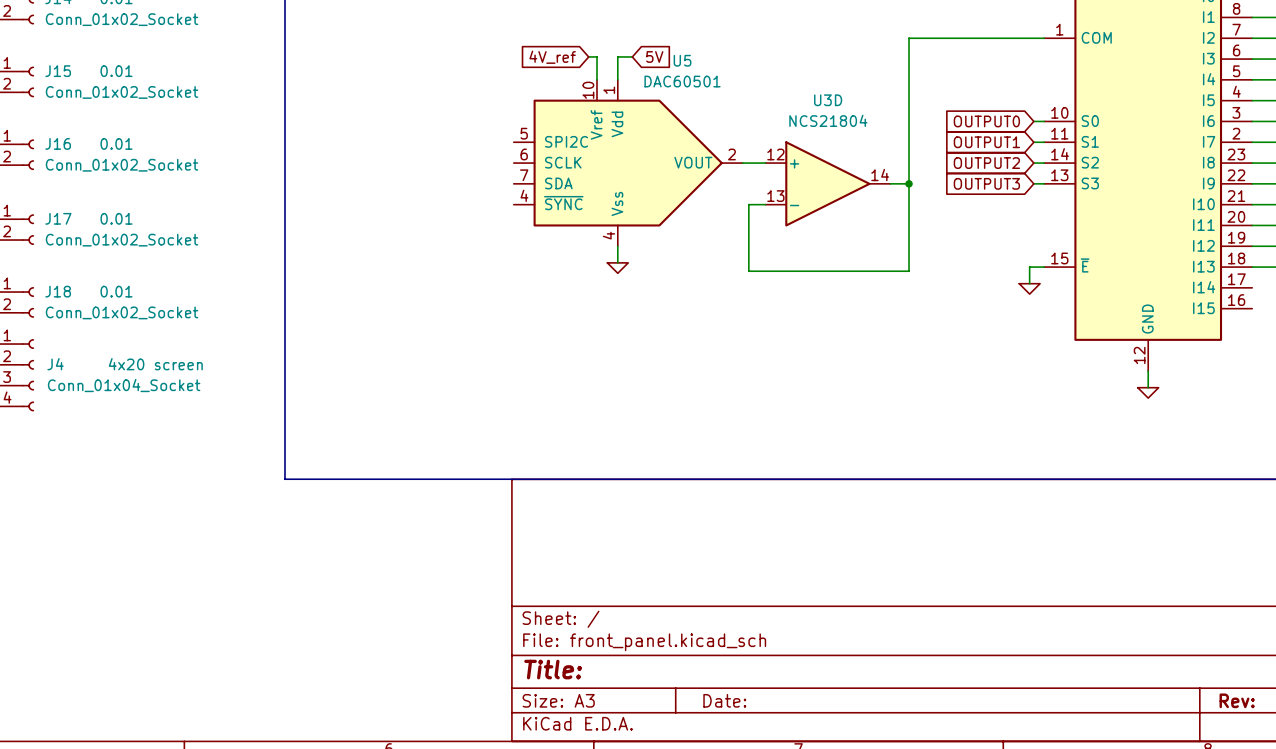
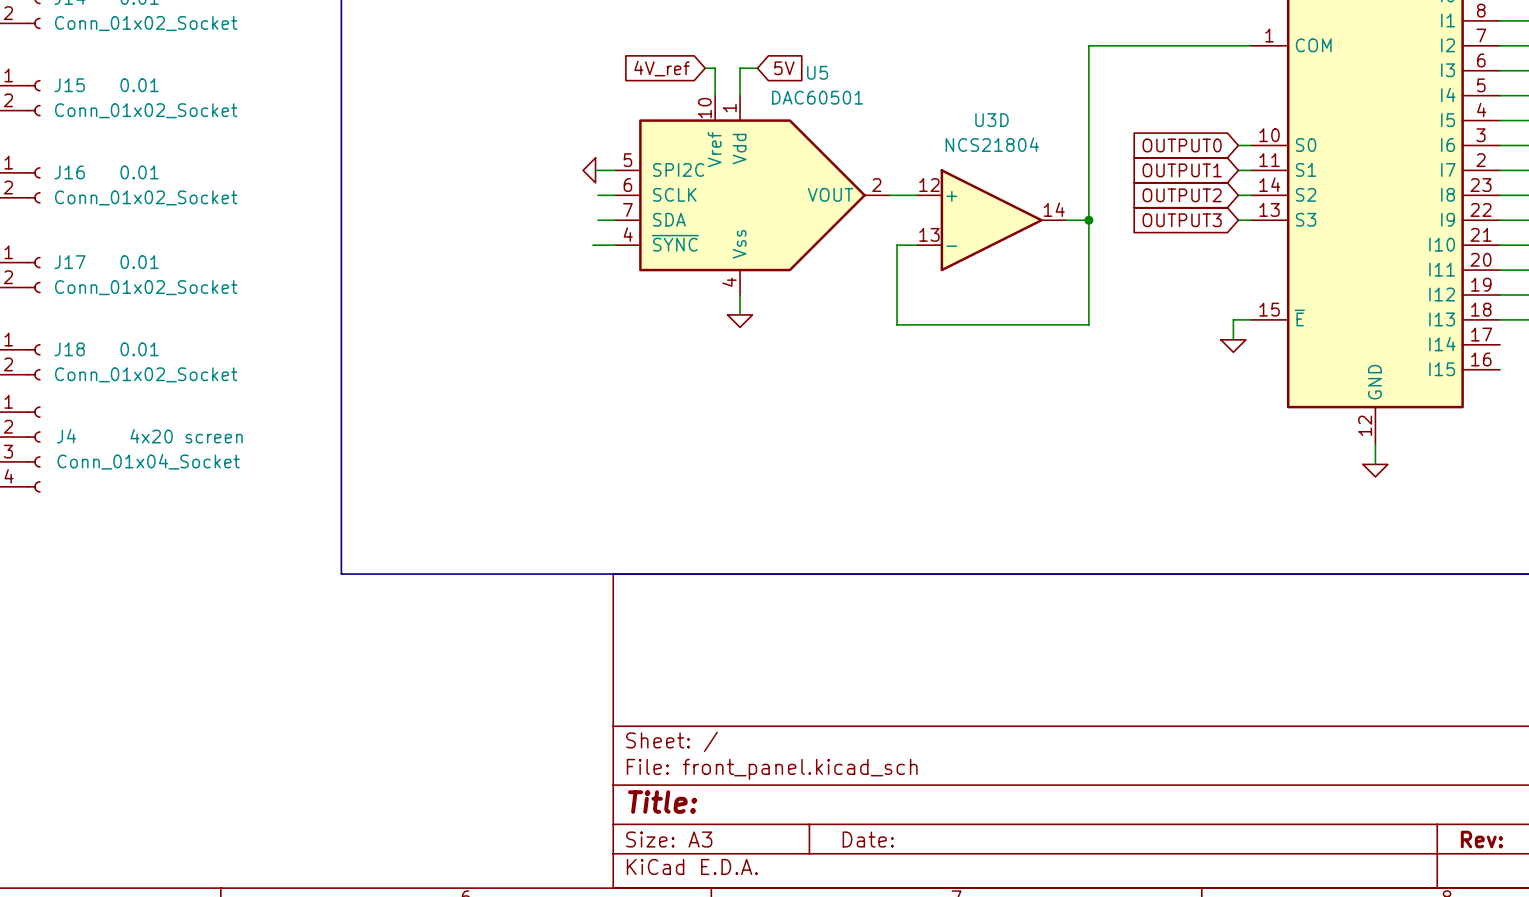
power symbol: none -> (589, 170)
wire: none -> (595, 170) (615, 170)
wire: none -> (598, 195) (615, 195)
wire: none -> (598, 220) (615, 220)
wire: none -> (593, 245) (615, 245)

